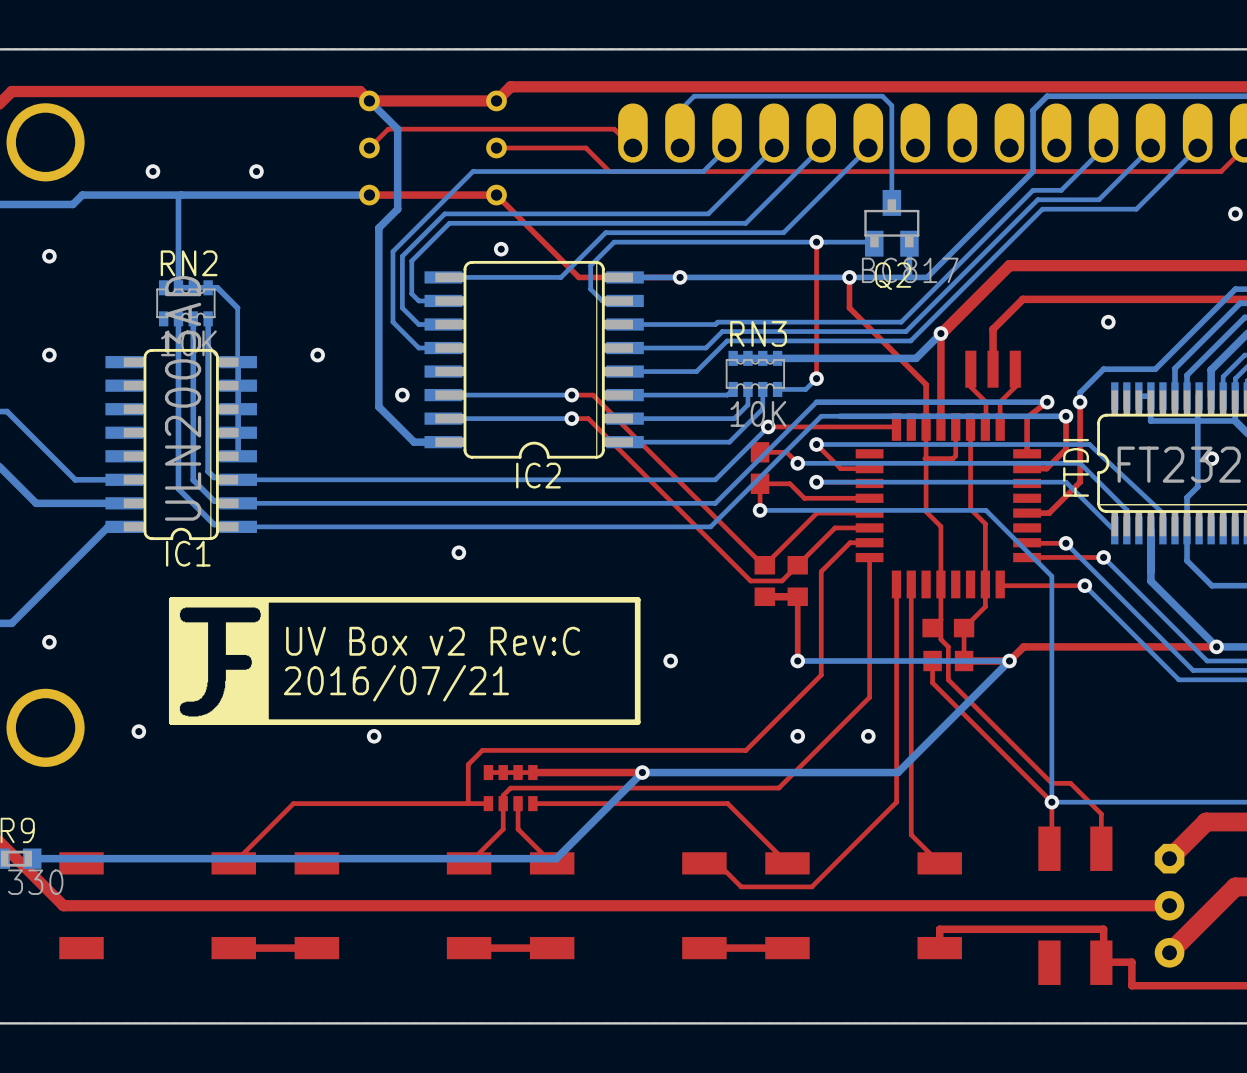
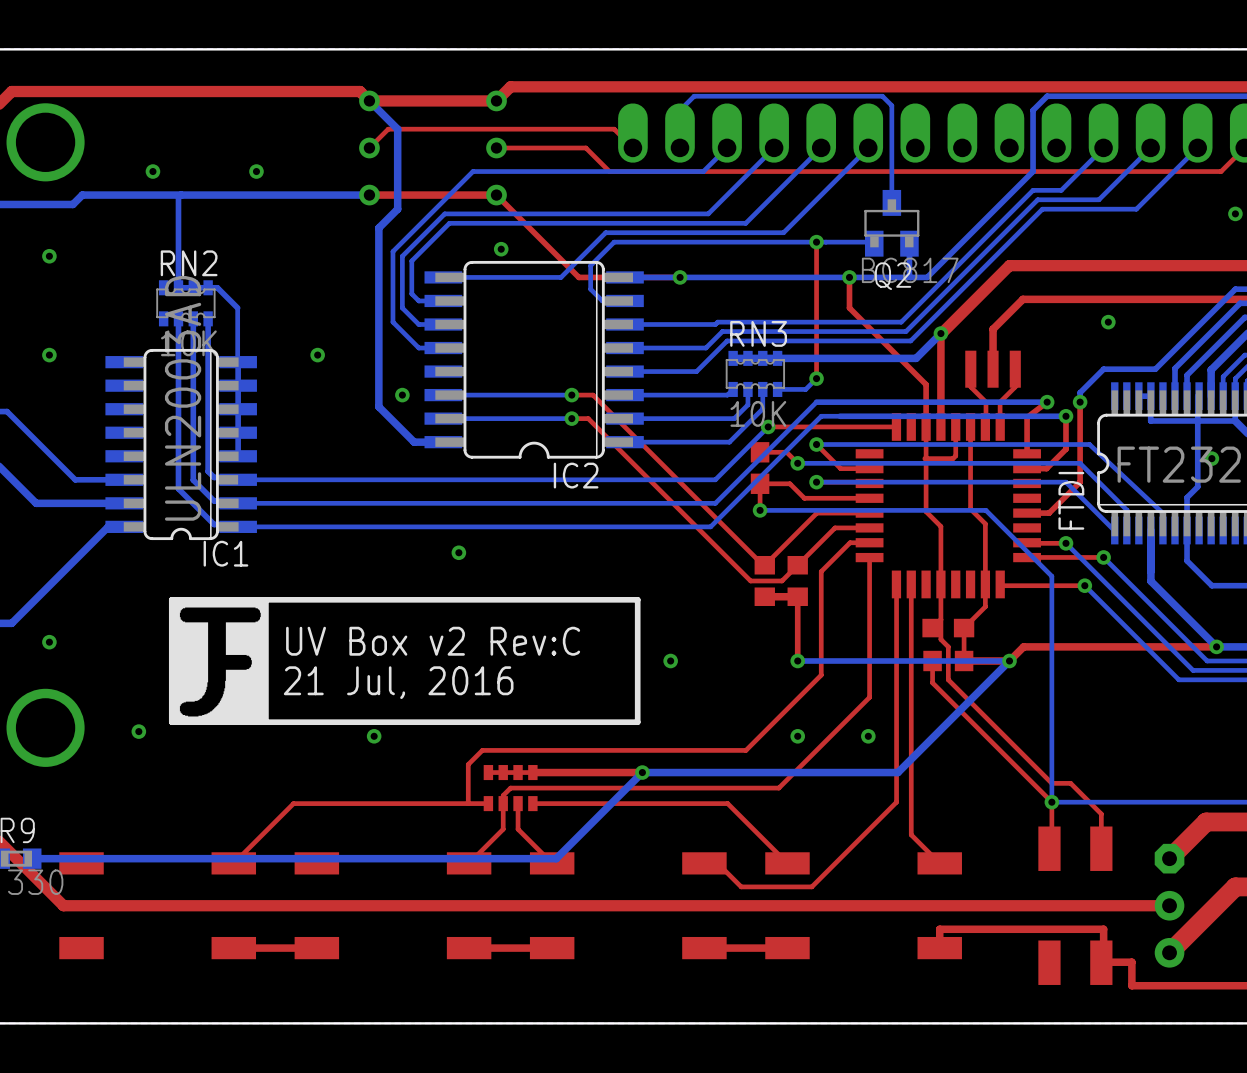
FTDI name position: FTDI (1076, 467) -> FTDI (1071, 500)
IC2 name position: IC2 (538, 475) -> IC2 (576, 475)
IC1 name position: IC1 (188, 553) -> IC1 (225, 553)
text: 2016/07/21 (396, 683) -> 21 Jul, 2016 (398, 682)

